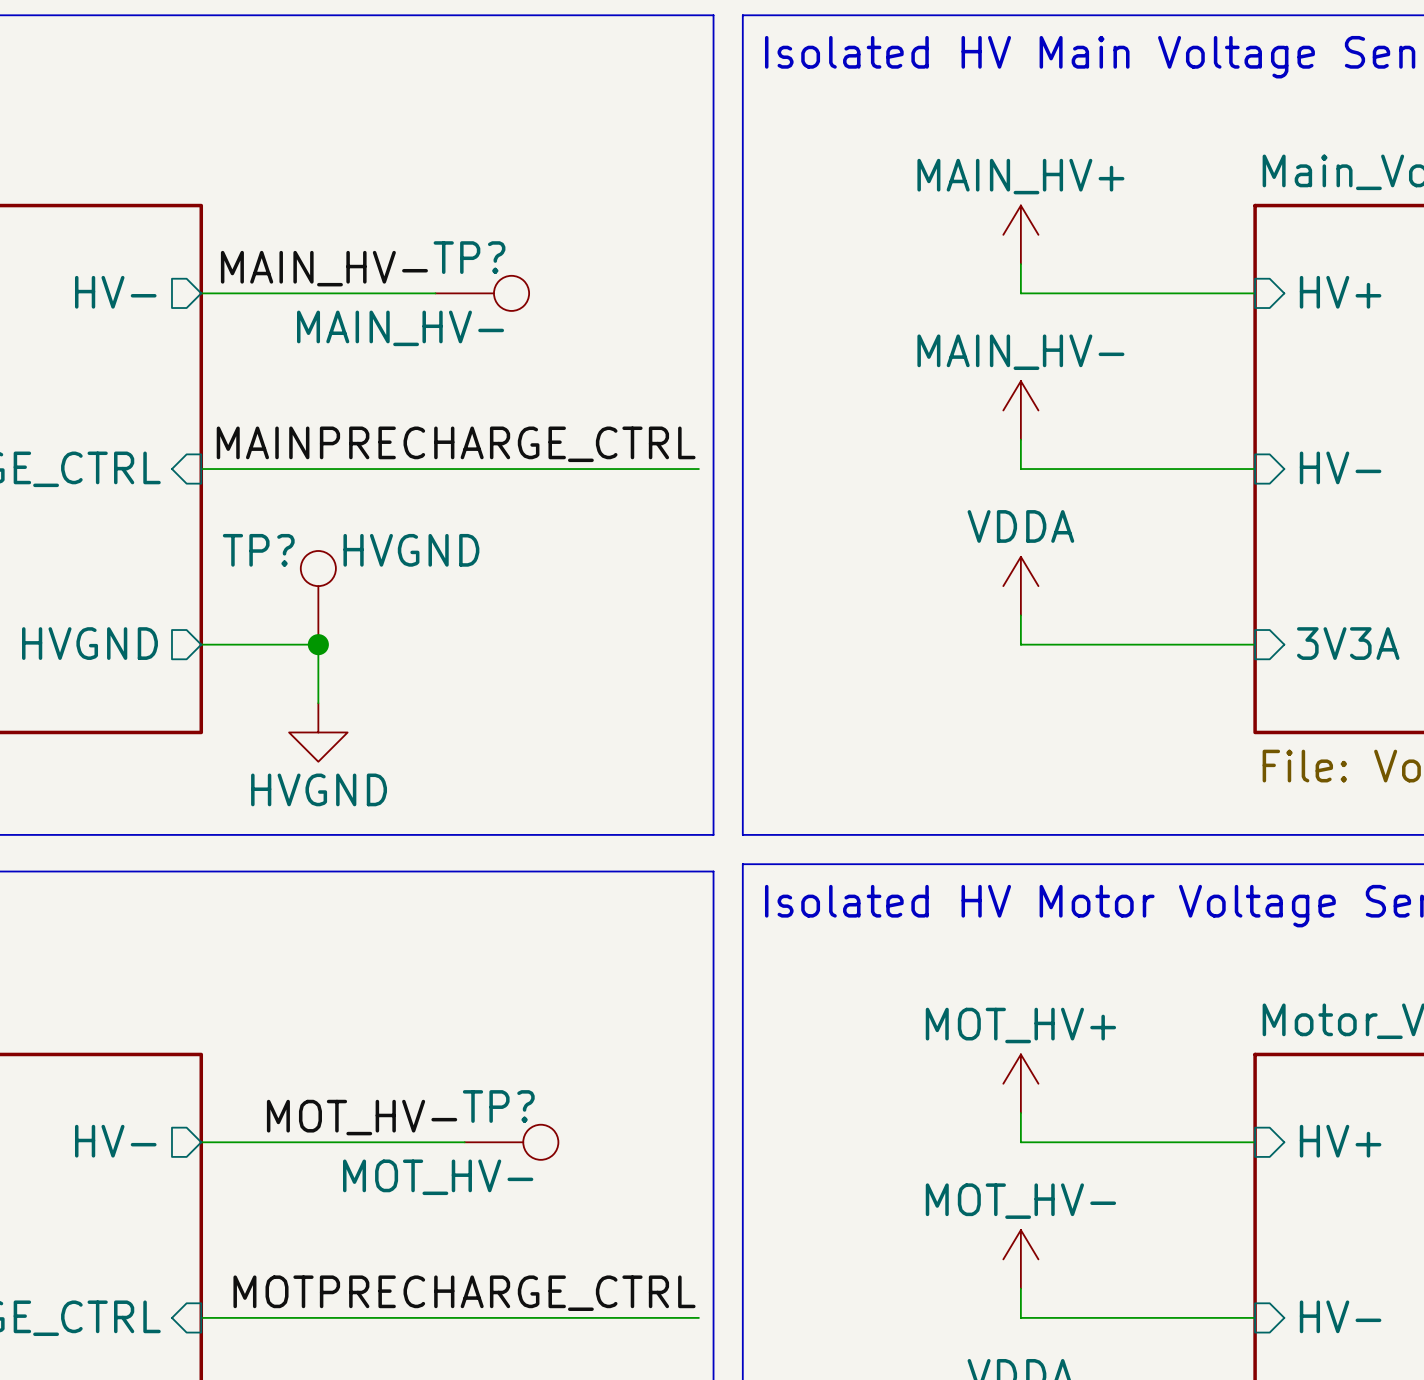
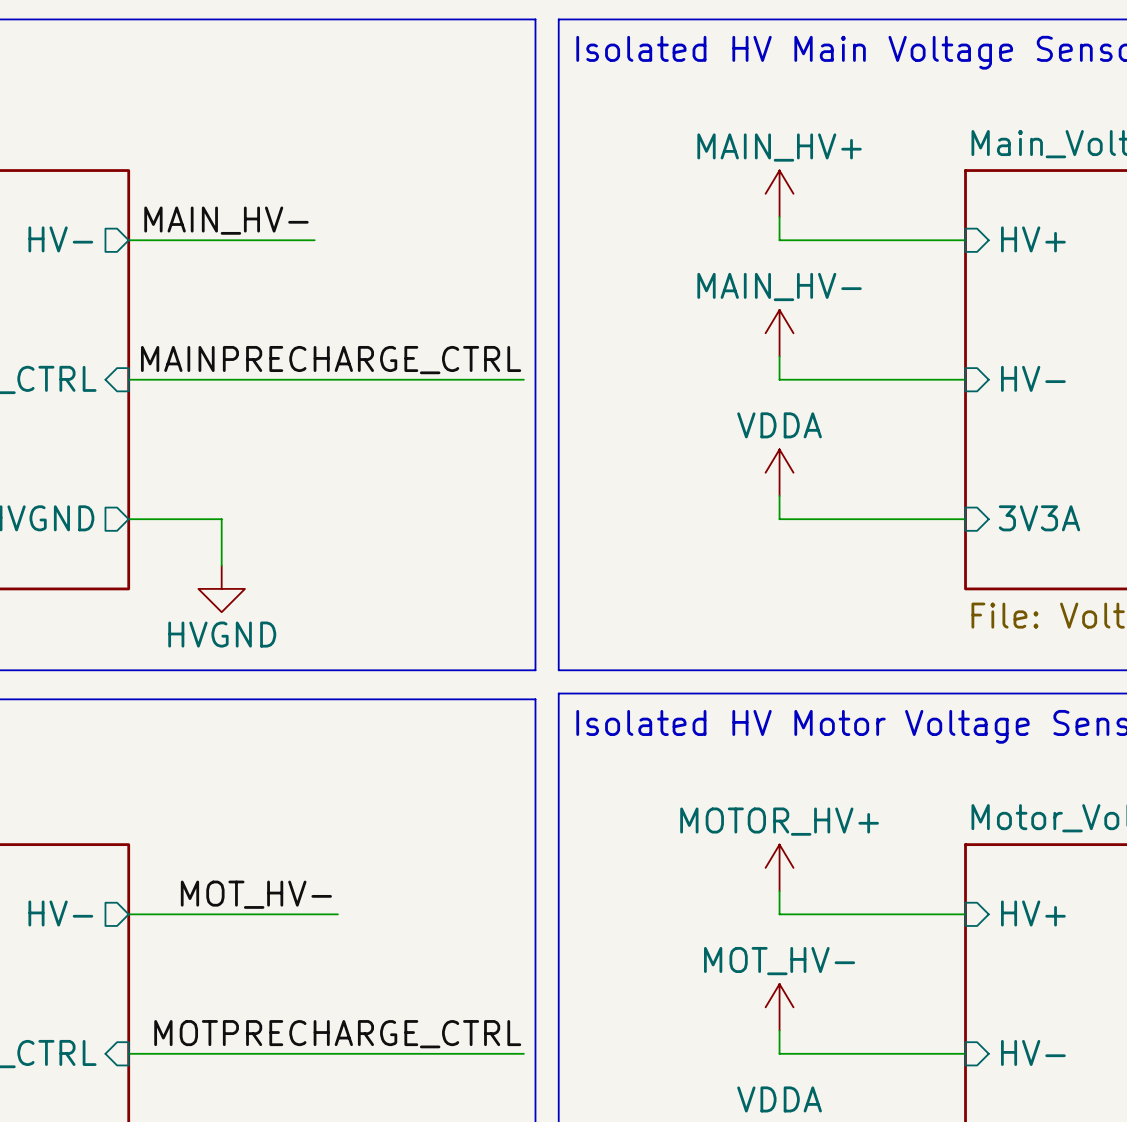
TP?: MAIN_HV- (482, 293) -> none
TP?: HVGND (318, 597) -> none
junction: (318, 644) -> none
power symbol: MOT_HV+ (1020, 1083) -> MOTOR_HV+ (779, 867)
TP?: MOT_HV- (511, 1142) -> none

